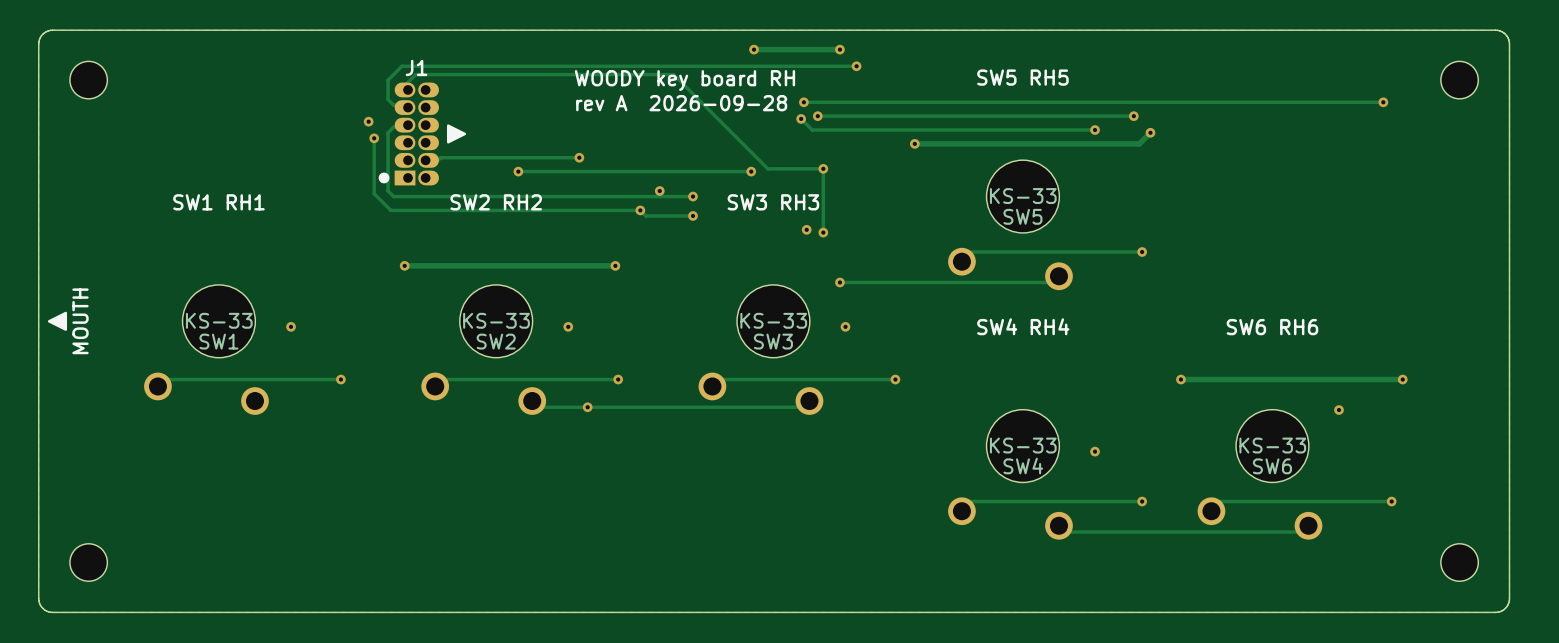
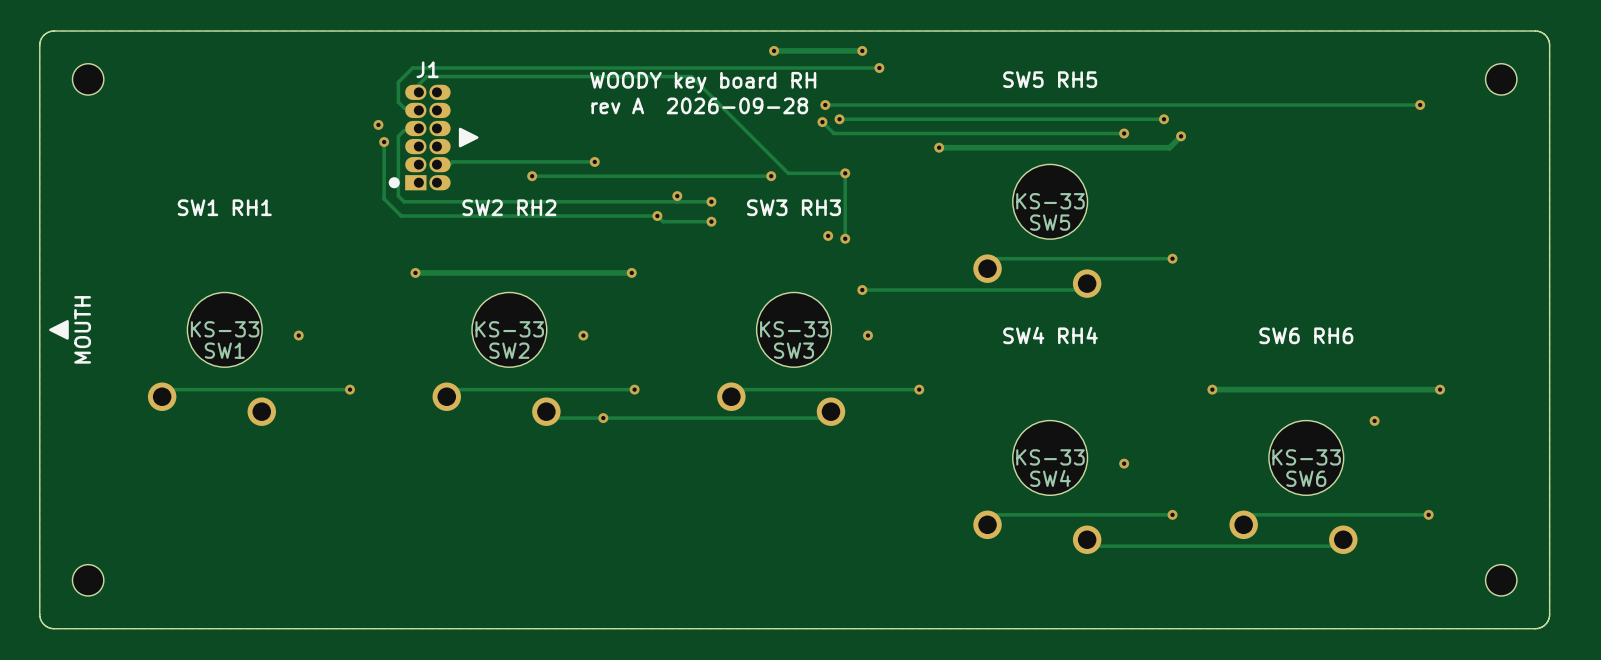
part footprint: [69, 61, 108, 99] -> [72, 63, 104, 96]
part footprint: [1440, 61, 1479, 99] -> [1485, 63, 1517, 96]
part footprint: [69, 543, 108, 582] -> [72, 564, 104, 596]
part footprint: [1440, 543, 1479, 582] -> [1485, 564, 1517, 596]

